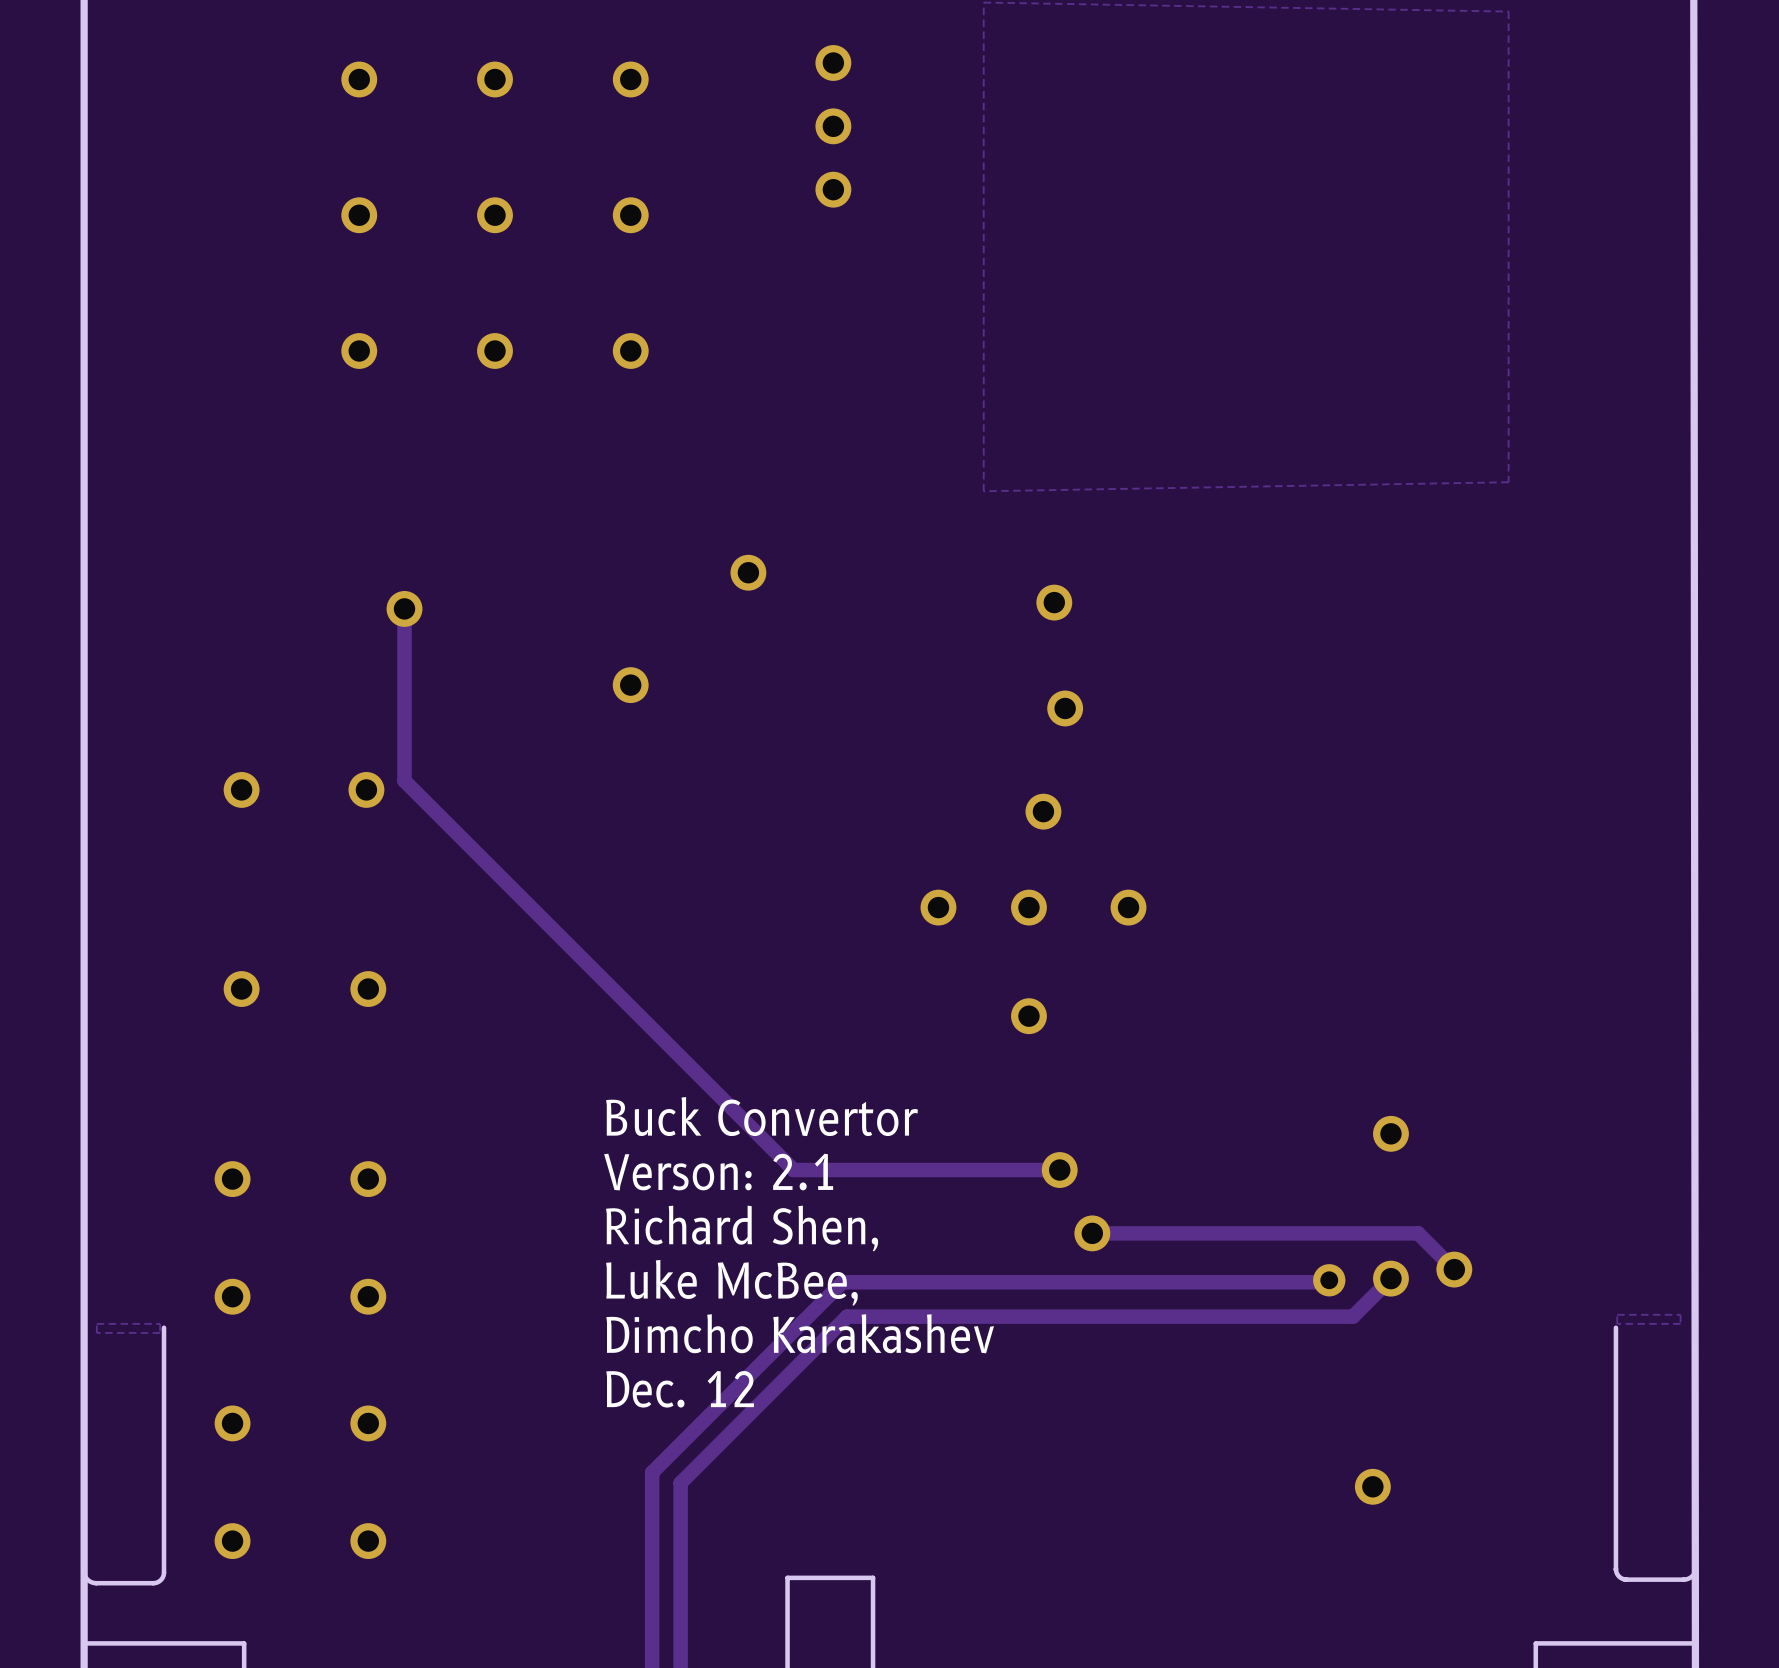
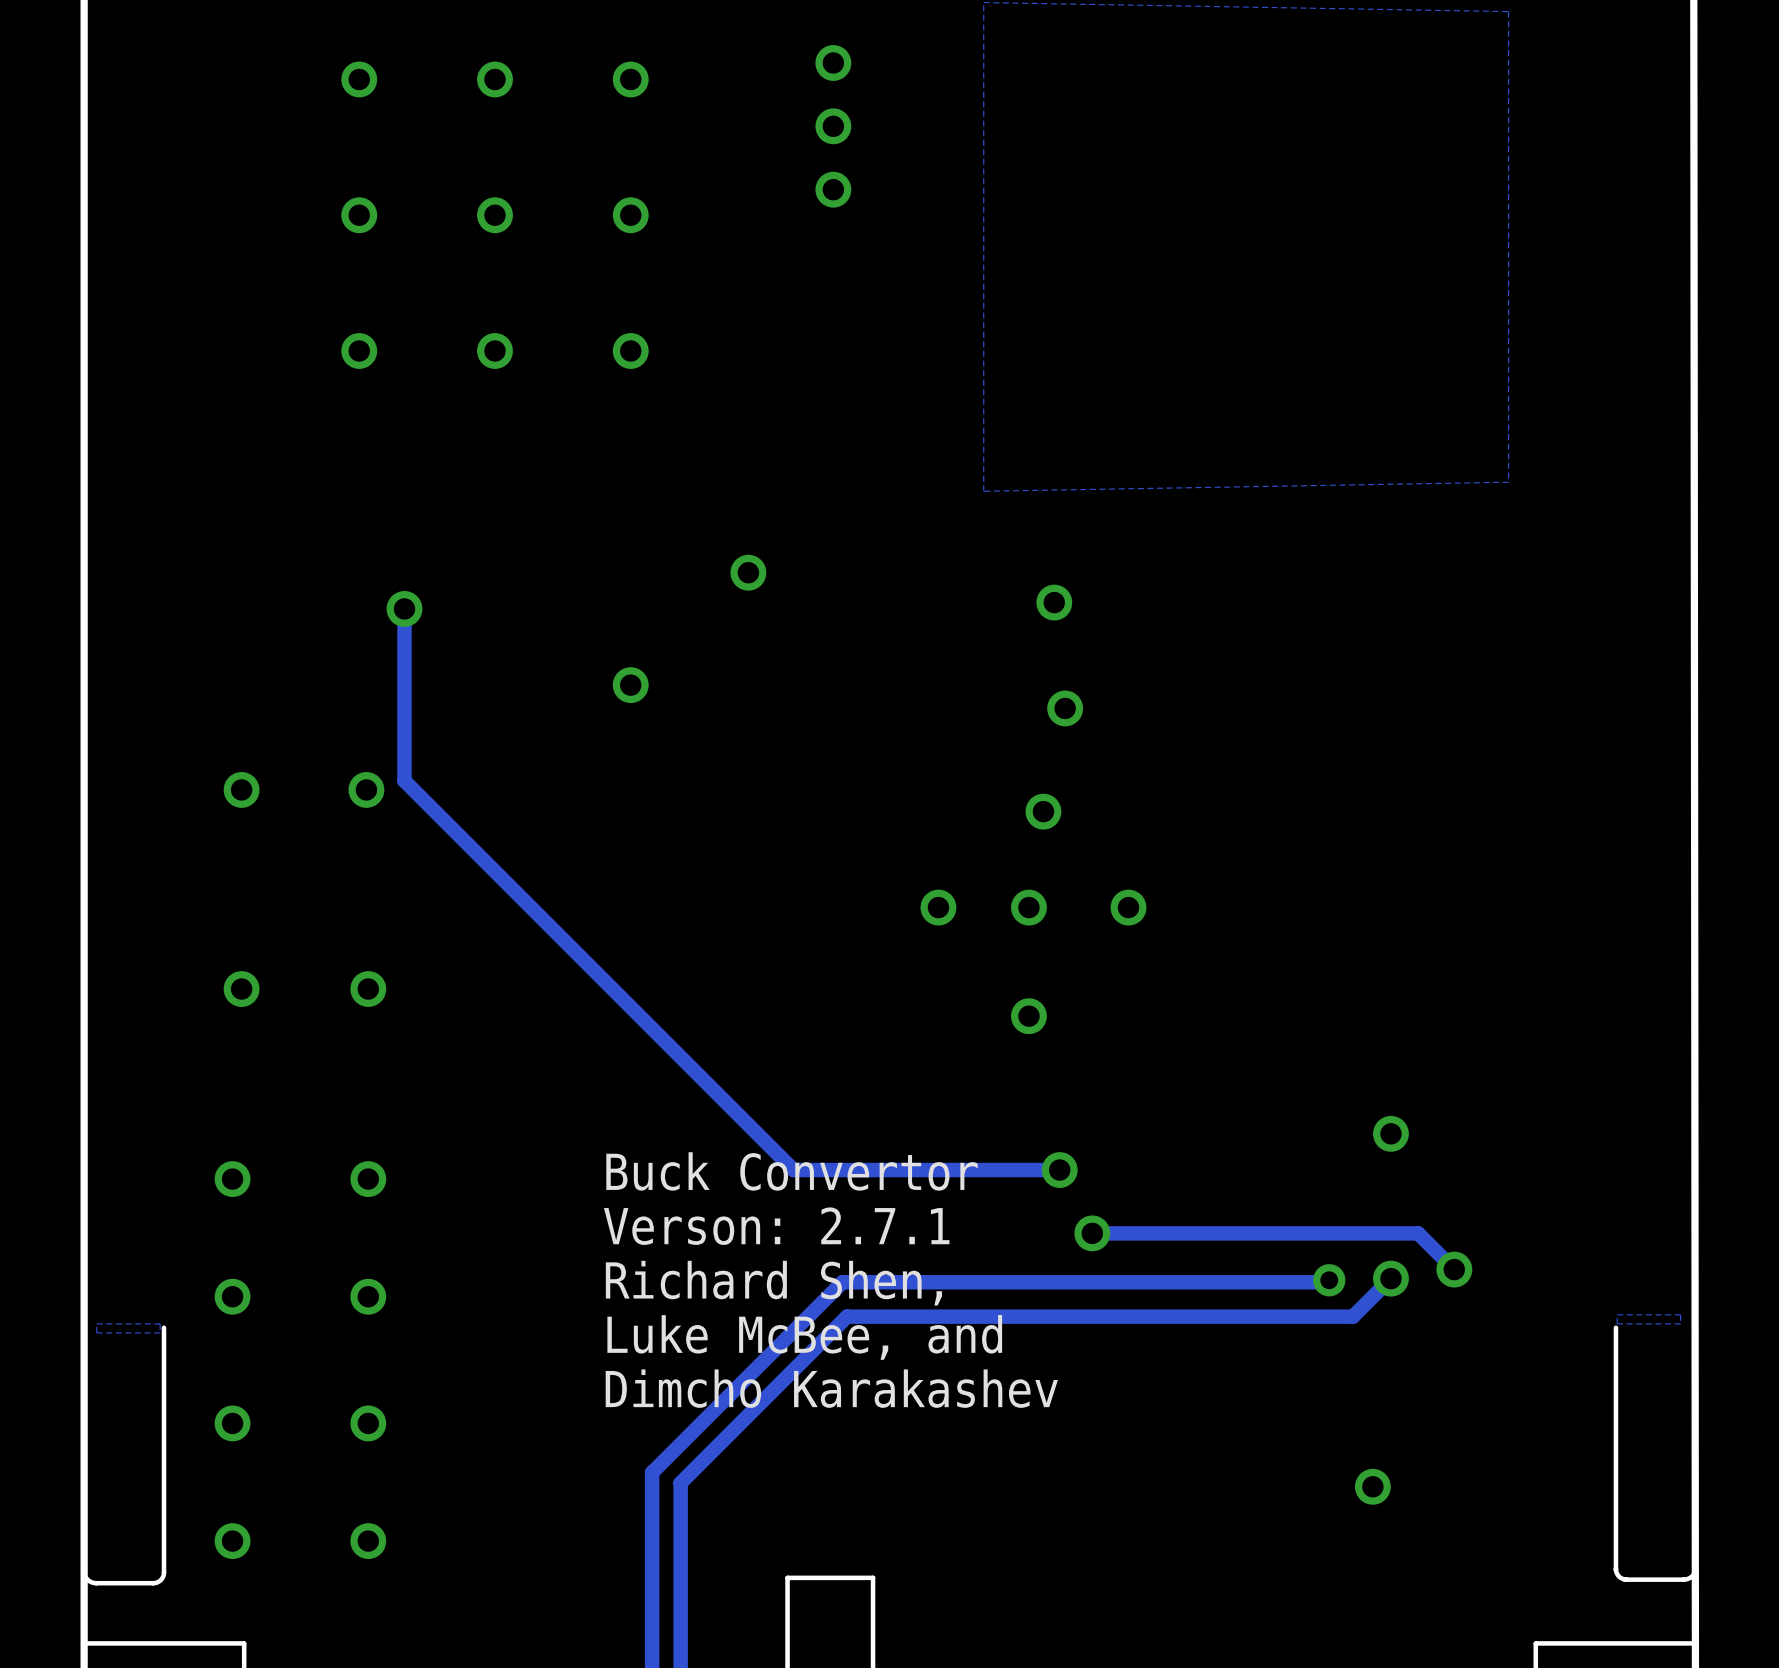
text: Buck Convertor (761, 1116) -> none
text: Verson: 2.1 (718, 1172) -> Buck Convertor (792, 1171)
text: Richard Shen, (742, 1228) -> Verson: 2.7.1 (776, 1226)
text: Luke McBee, (731, 1282) -> Richard Shen, (773, 1283)
text: Dimcho Karakashev (800, 1333) -> Luke McBee, and (804, 1337)
text: Dec. 12 (680, 1389) -> Dimcho Karakashev (831, 1388)

